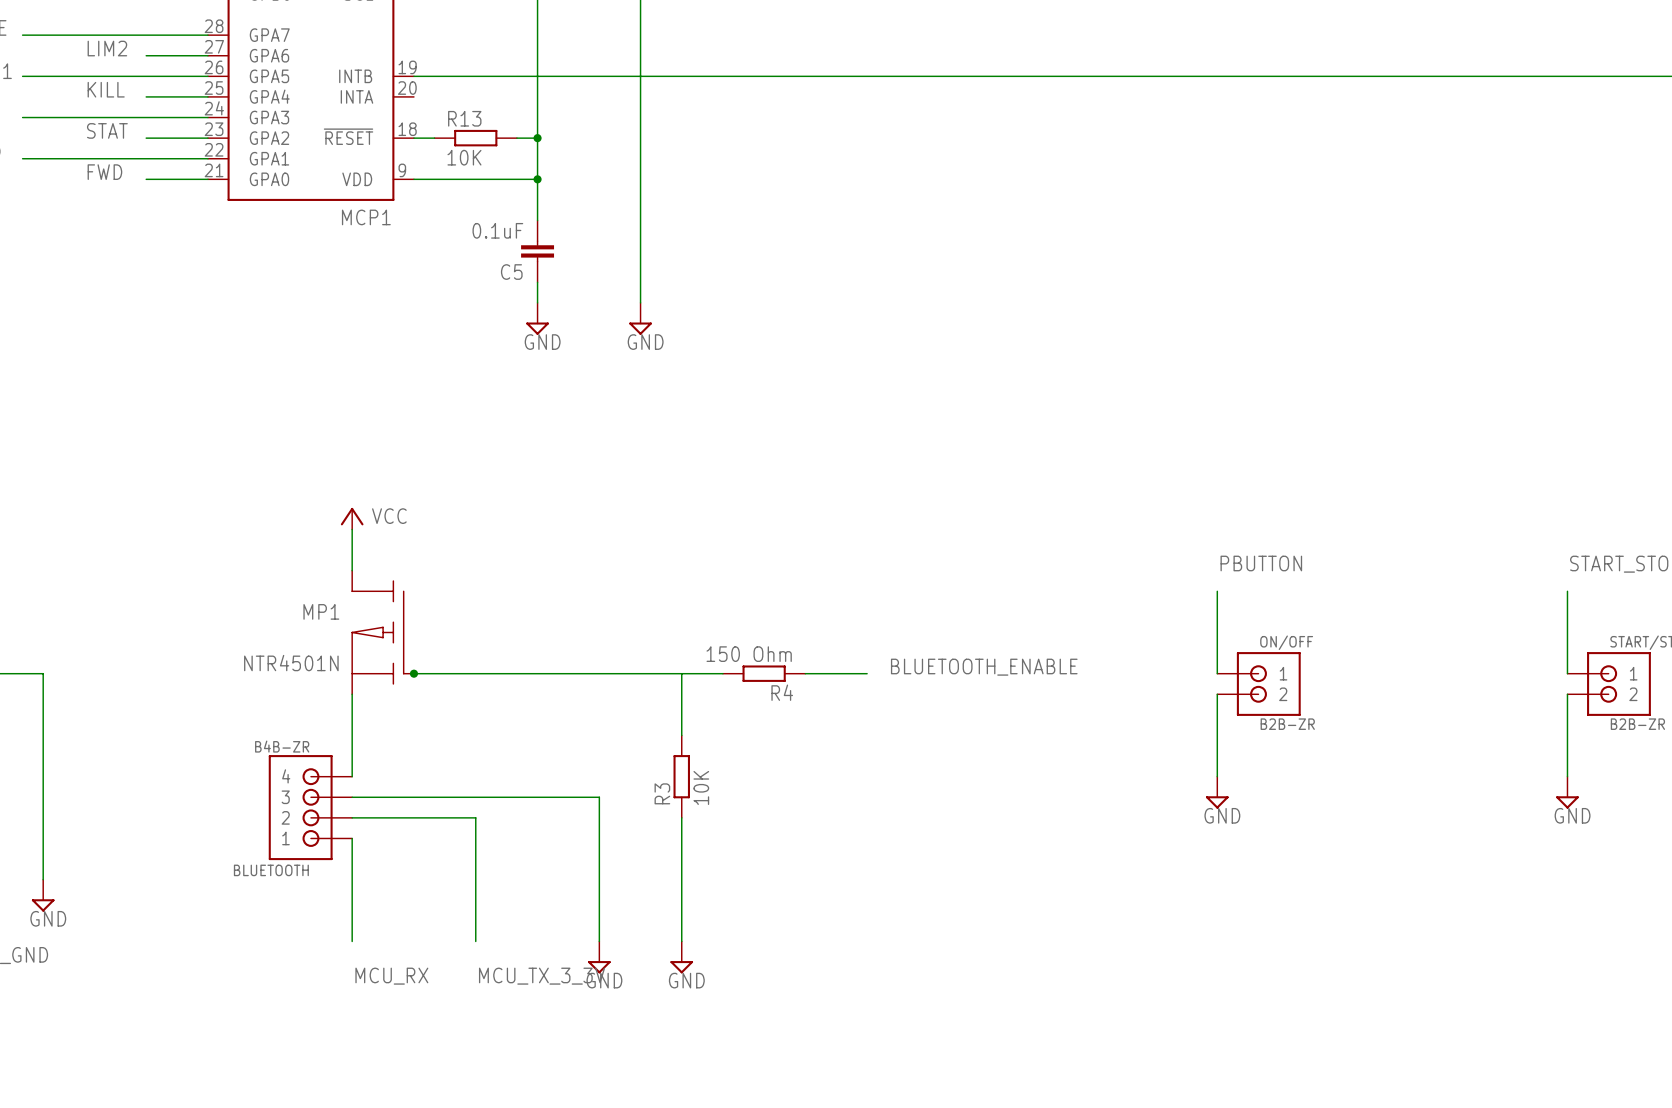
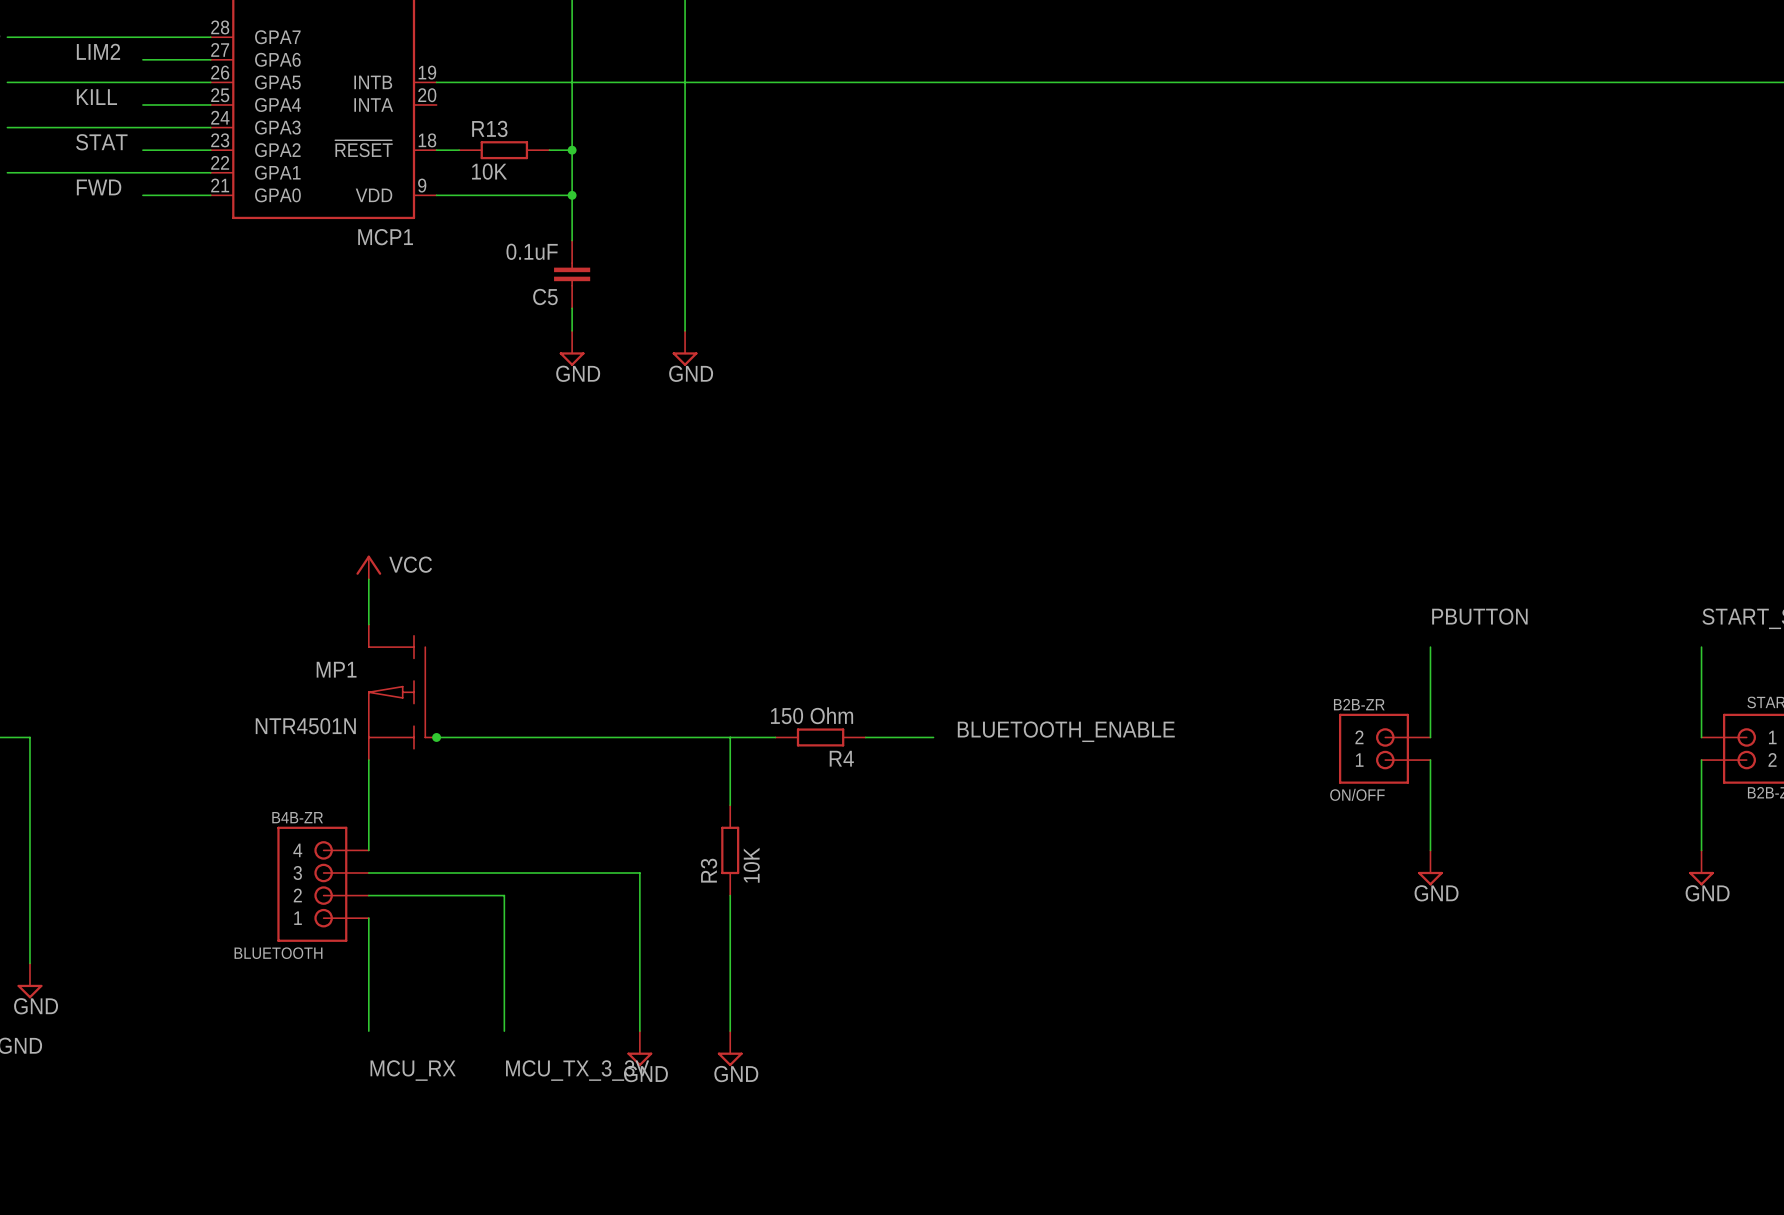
label position: PBUTTON (1261, 563) -> PBUTTON (1479, 616)
wire: (1217, 591) (1217, 673) -> (1430, 647) (1430, 737)
ON/OFF rotation: 0° (1268, 683) -> 180° (1374, 748)
wire: (1217, 694) (1217, 776) -> (1430, 760) (1430, 850)
power symbol position: GND (1217, 792) -> GND (1430, 867)

